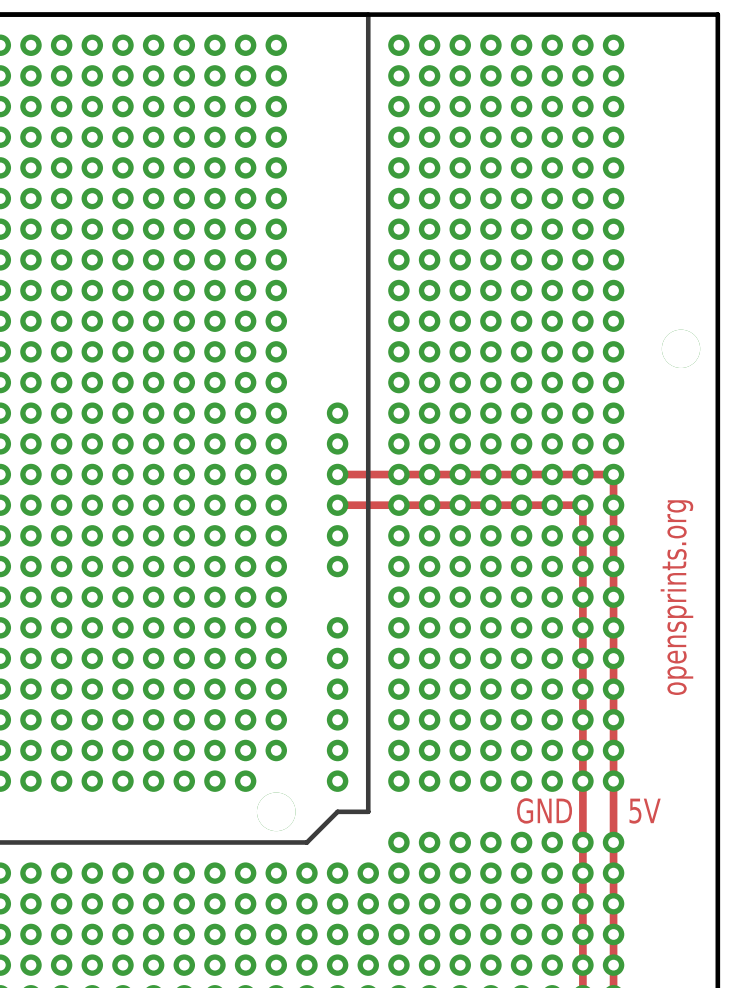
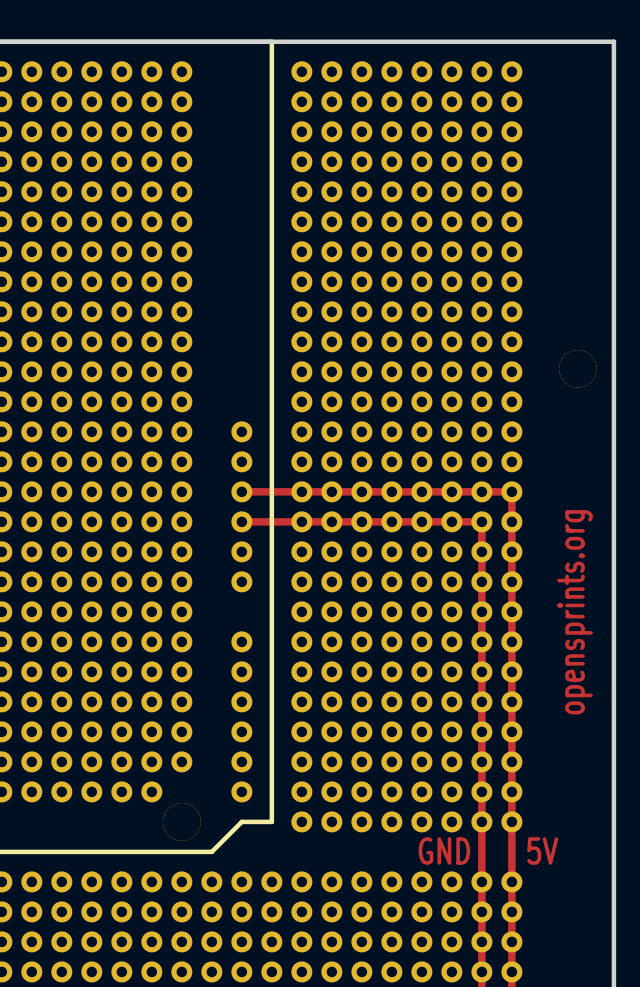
text position: GND (544, 810) -> GND (444, 851)
part: none -> (301, 821)
part: none -> (331, 821)
part: none -> (361, 821)
part: none -> (391, 821)
part: none -> (421, 821)
part: none -> (451, 821)
part: none -> (481, 821)
part: none -> (511, 821)
text position: 5V (645, 811) -> 5V (542, 851)
part: (398, 842) -> none
part: (429, 842) -> none
part: (460, 842) -> none
part: (490, 842) -> none
part: (521, 842) -> none
part: (552, 842) -> none
part: (582, 842) -> none
part: (613, 842) -> none

